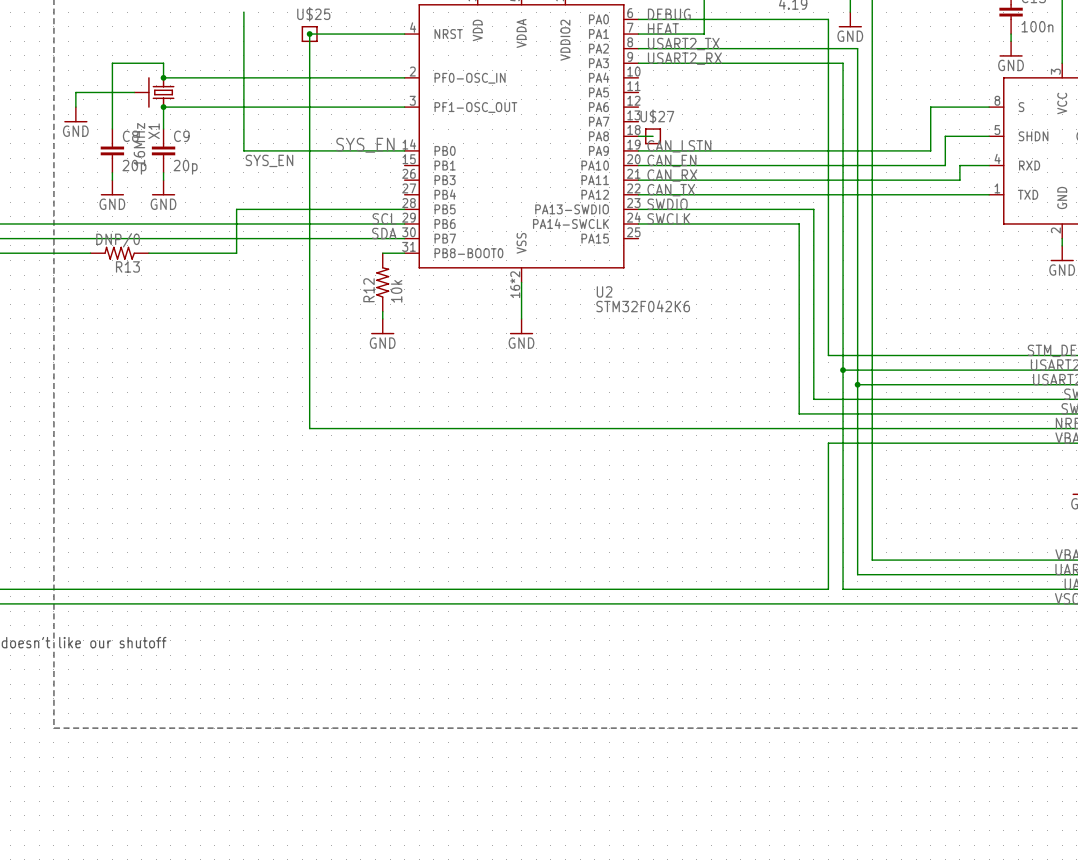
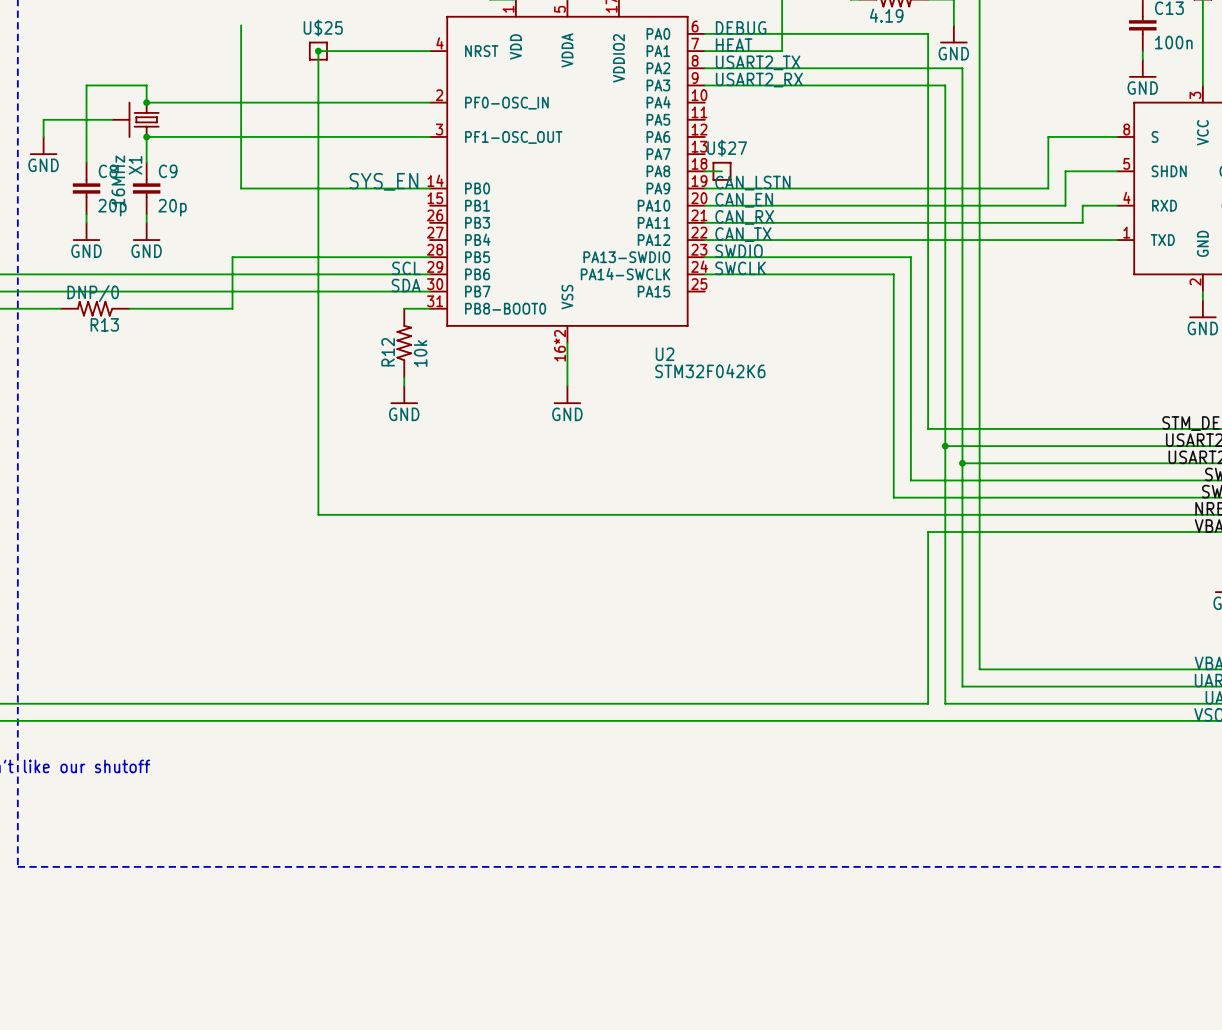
label: SYS_EN (269, 160) -> none

